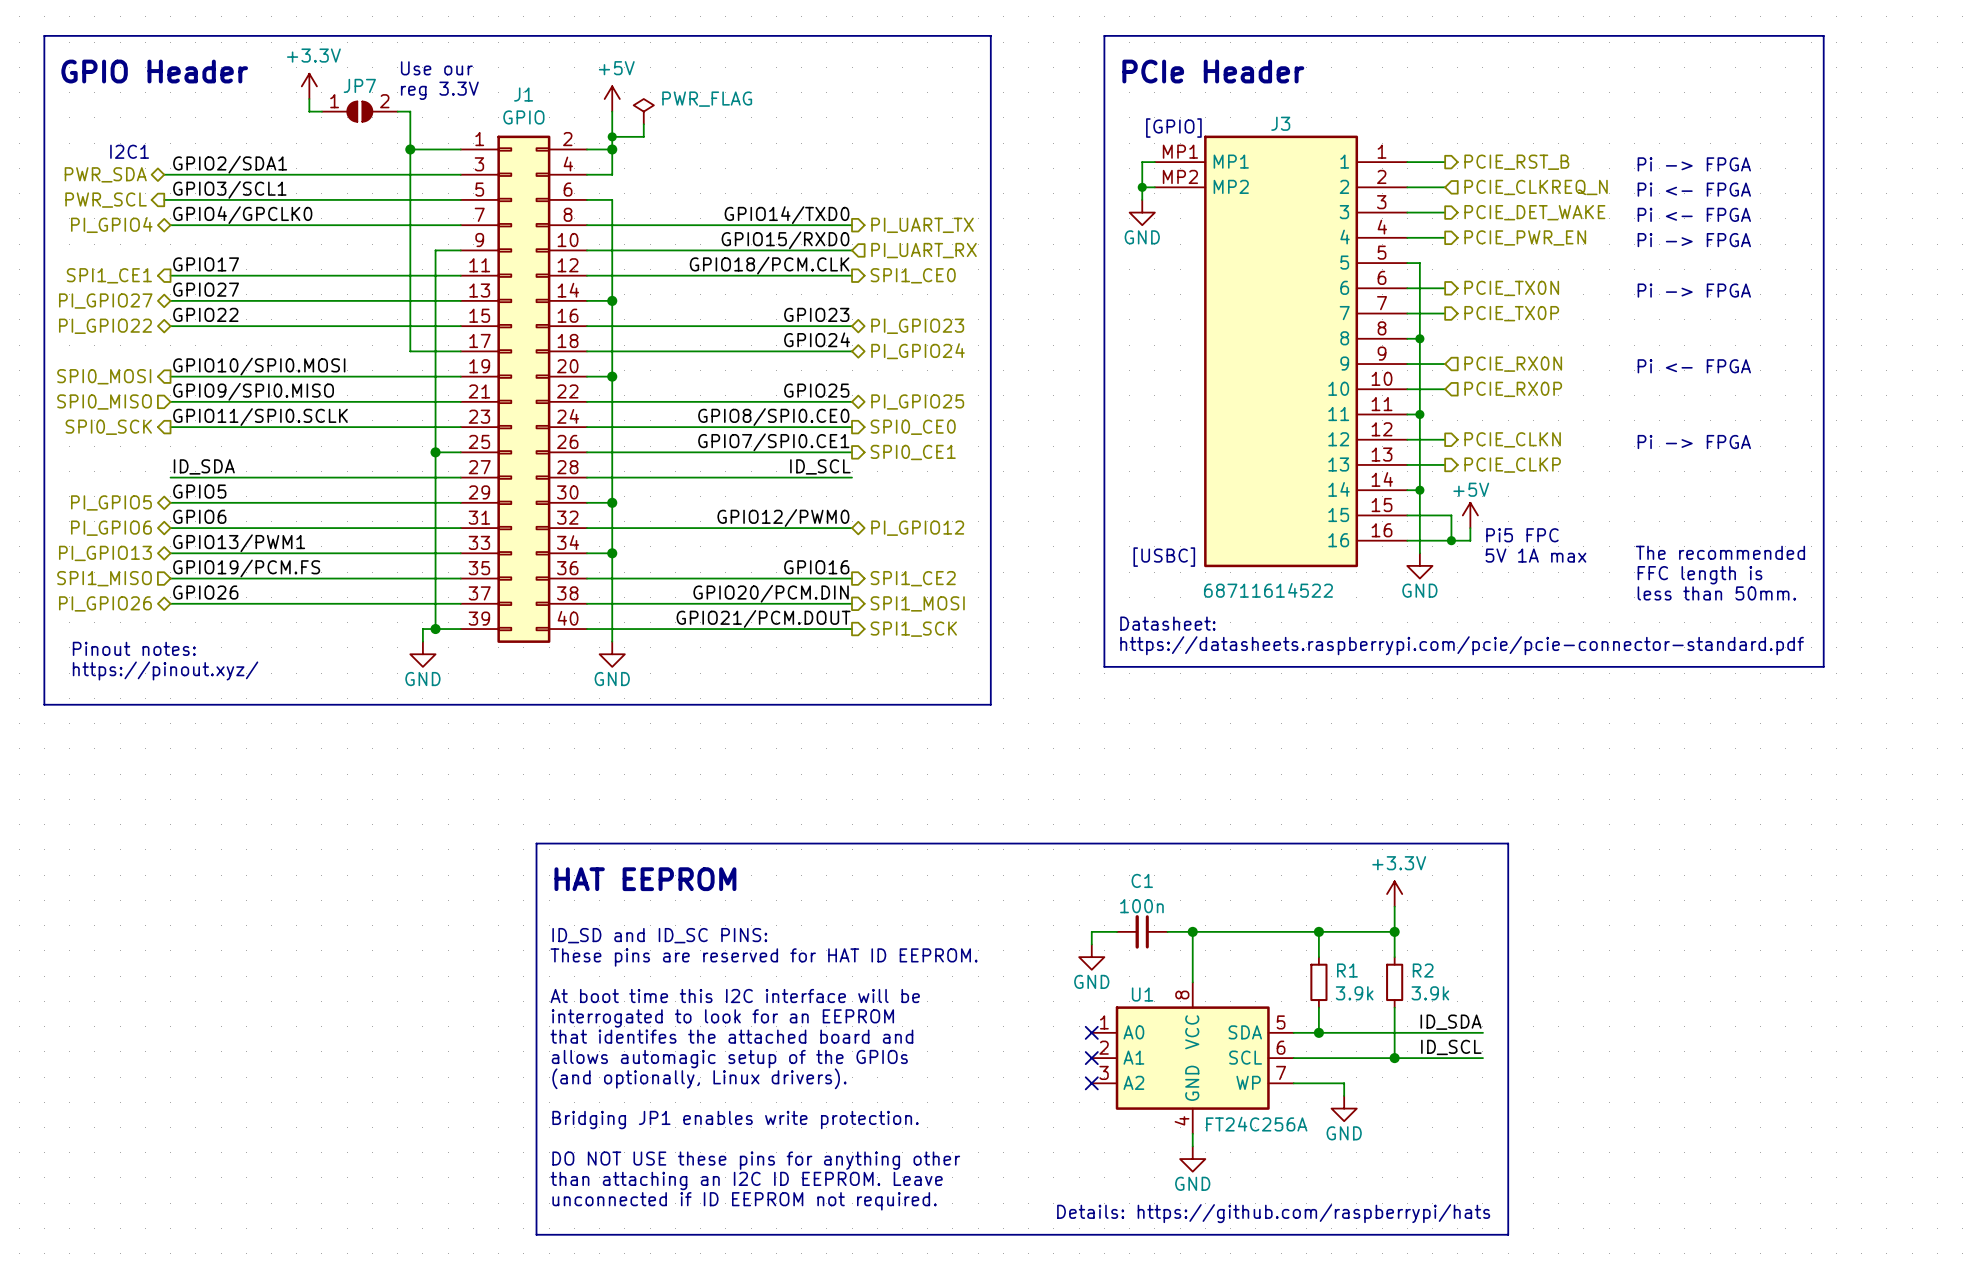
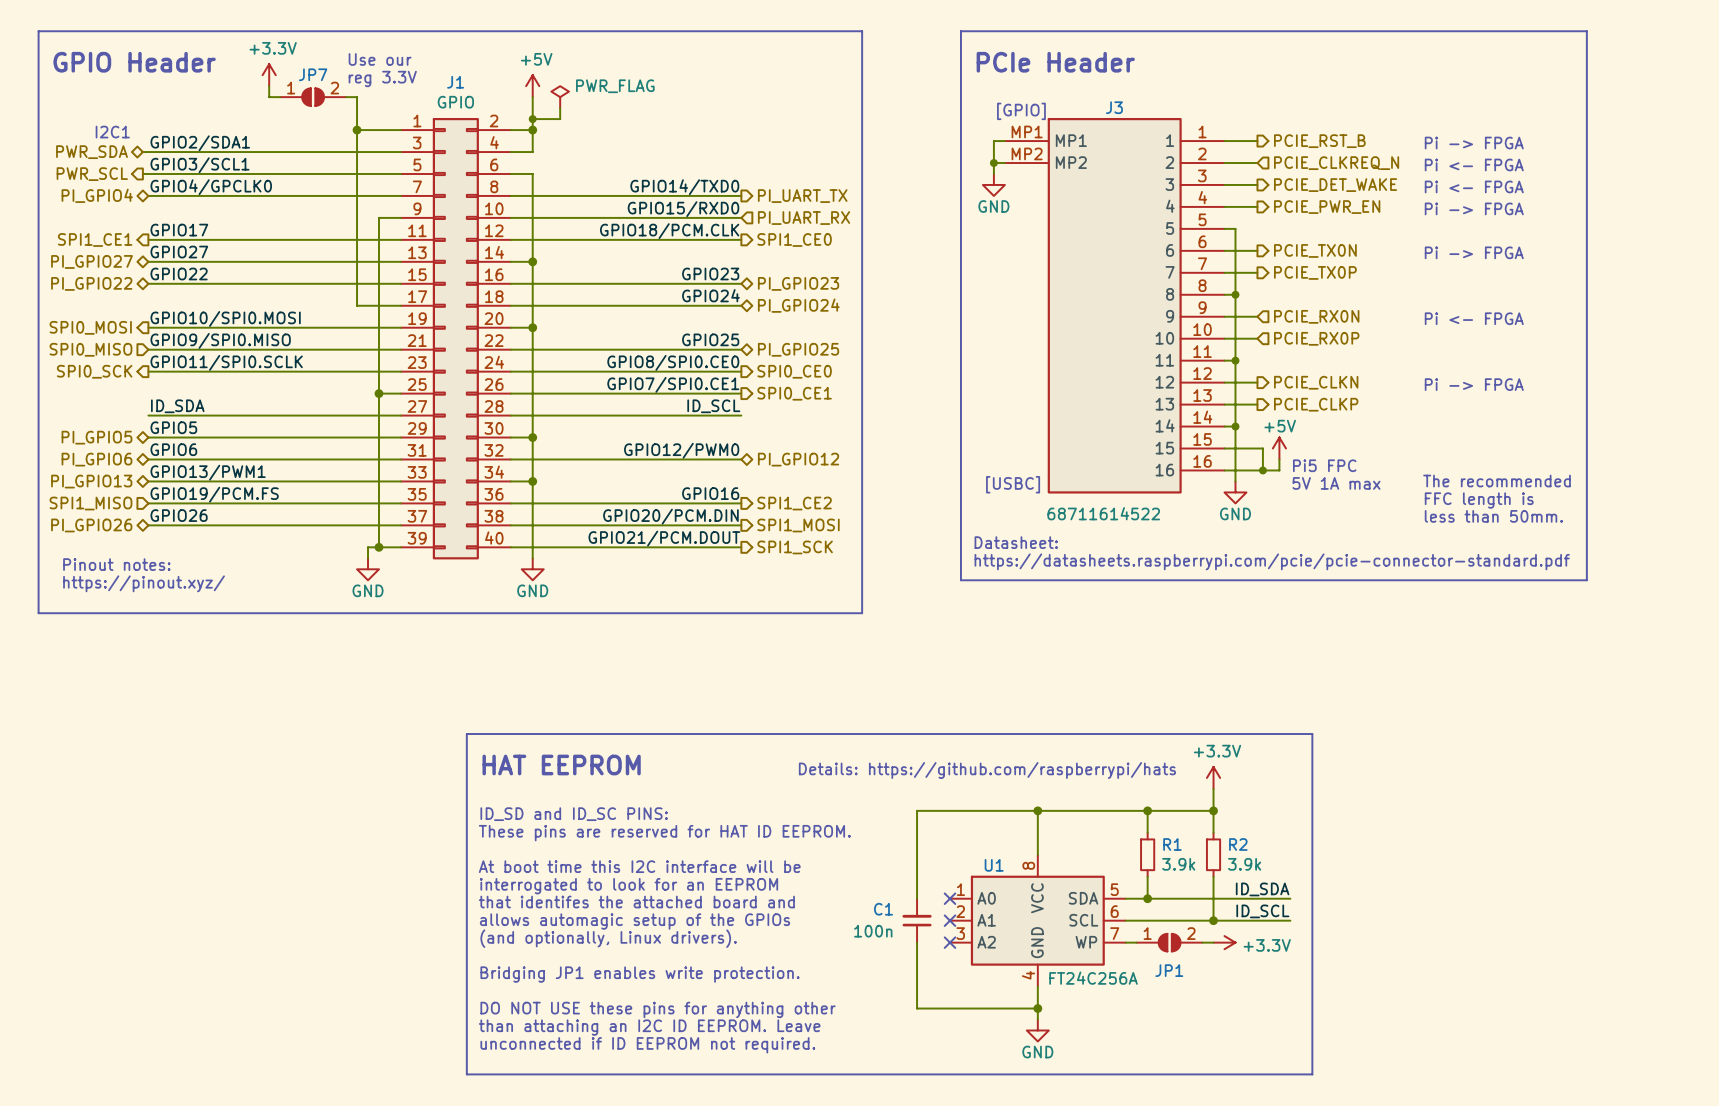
C1 name position: C1 (1142, 880) -> C1 (883, 909)
text: none -> Details: https://github.com/raspberrypi/hats (987, 770)
C1 value position: 100n (1141, 906) -> 100n (873, 931)
wire: (1091, 931) (1091, 944) -> (949, 810) (917, 810) (917, 898)
C1 rotation: 0° (1142, 931) -> 90° clockwise (917, 920)
C1 position: (1142, 931) -> (917, 920)
power symbol: GND (1091, 957) -> none
wire: none -> (917, 942) (917, 1008) (1037, 1008)
JP1: none -> (1169, 942)
wire: none -> (1202, 942) (1213, 942)
power symbol: none -> +3.3V (1224, 942)
power symbol: GND (1344, 1108) -> none
power symbol position: GND (1192, 1159) -> GND (1037, 1030)
junction: none -> (1037, 1008)
text: Details: https://github.com/raspberrypi/hats (1273, 1213) -> none

